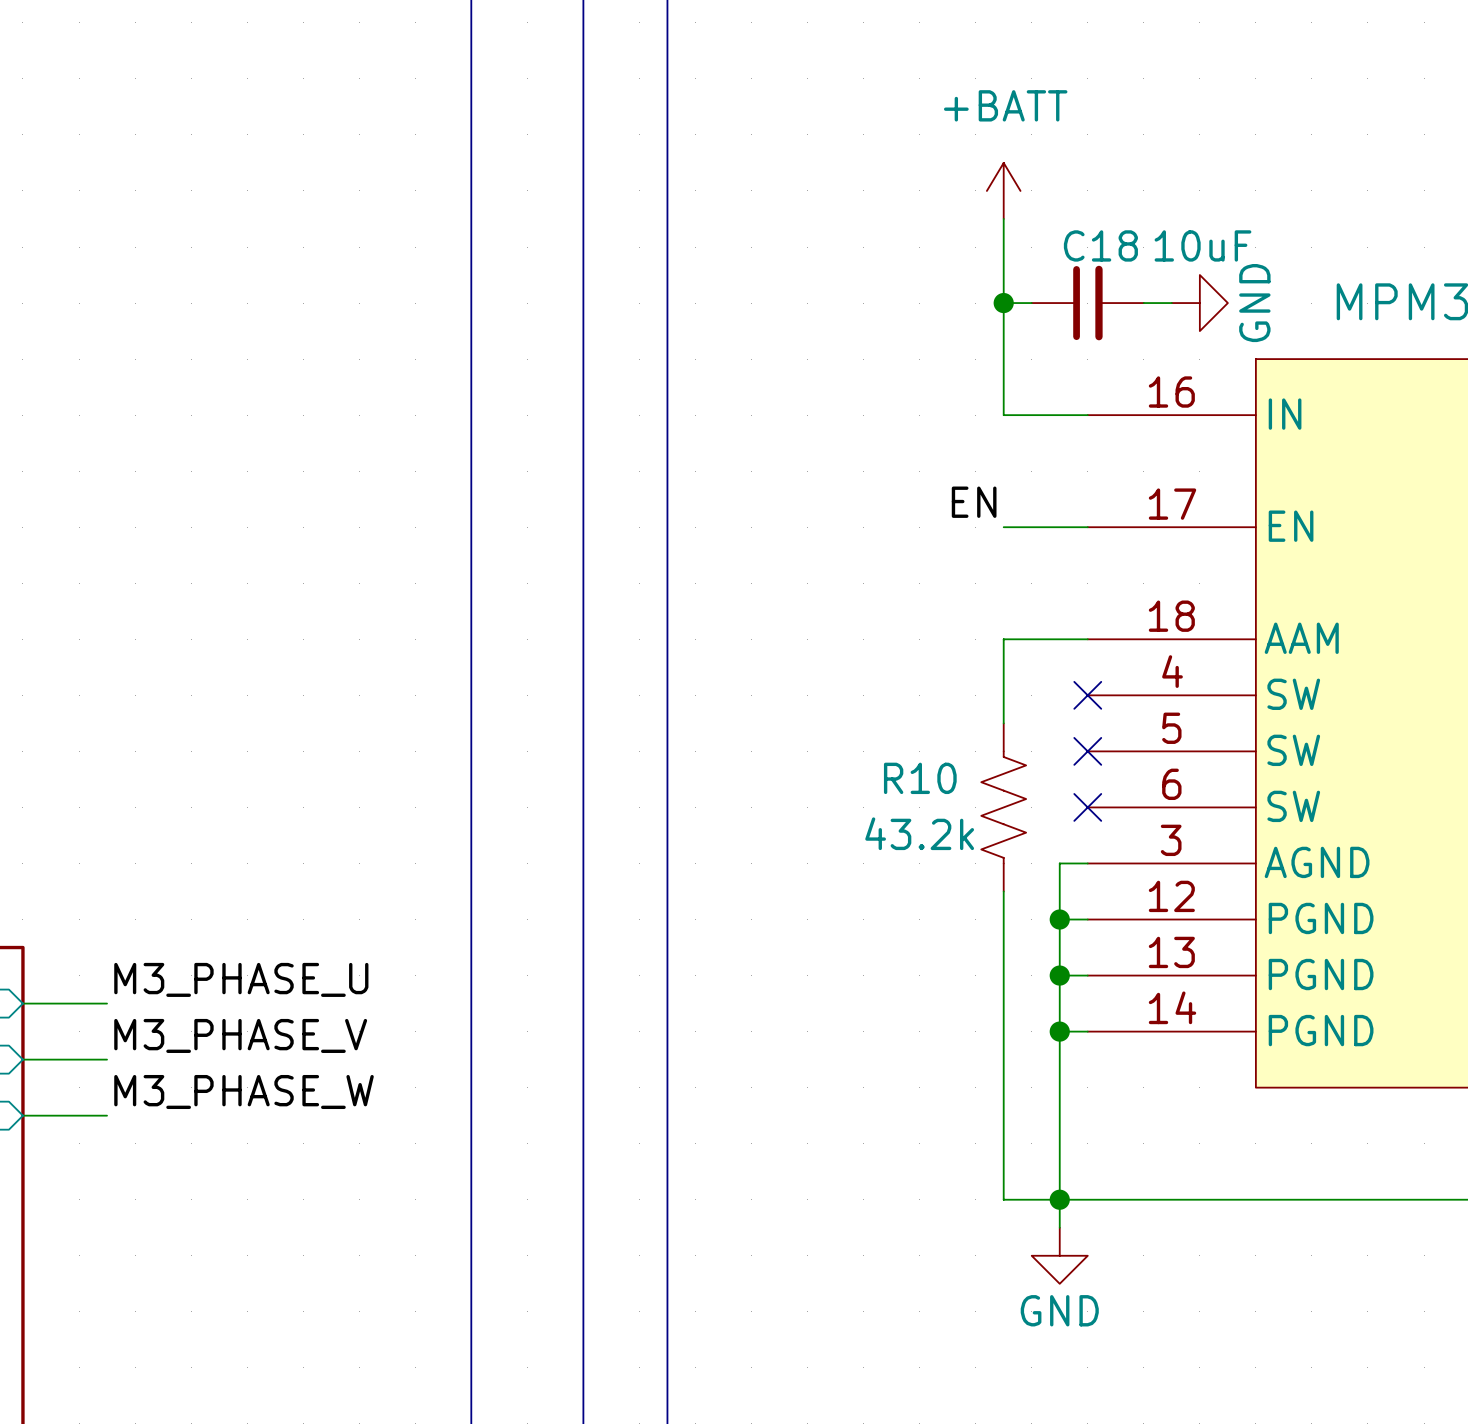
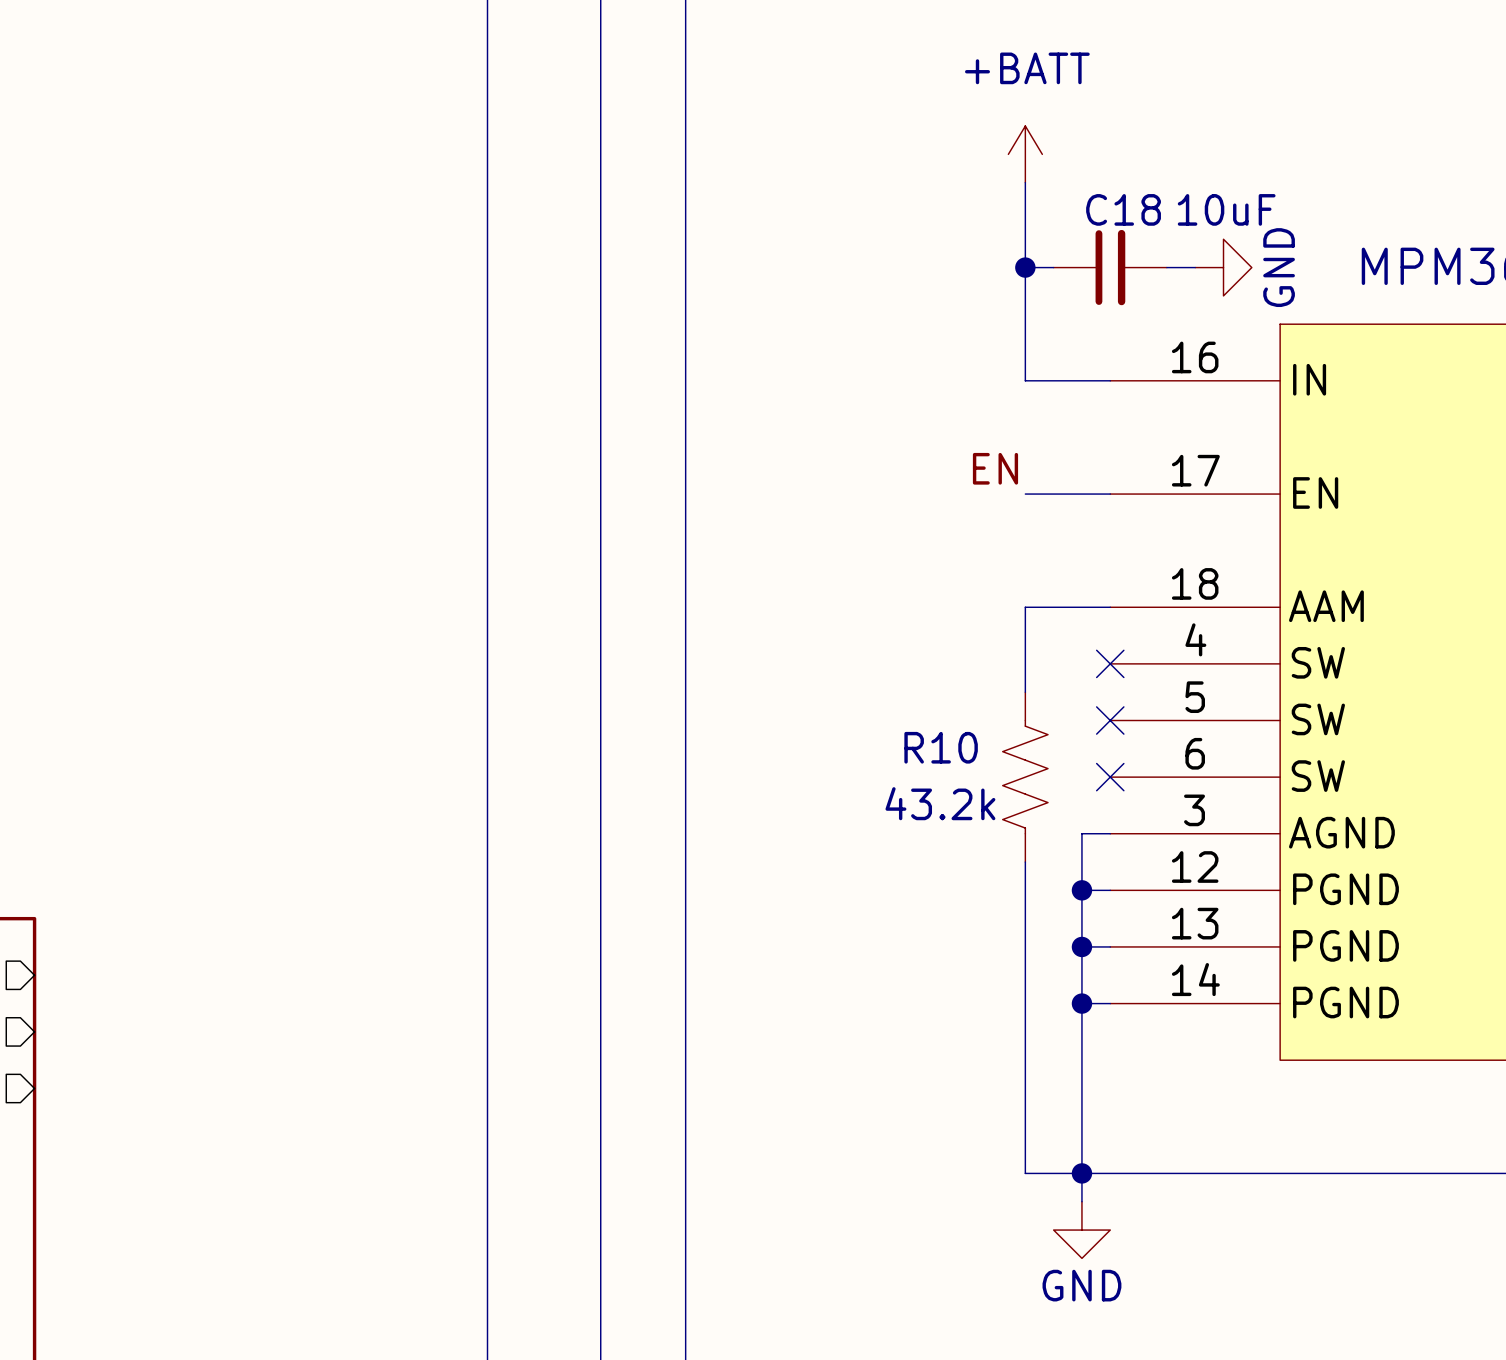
label: M3_PHASE_U (241, 979) -> none
wire: (22, 1003) (107, 1003) -> none
label: M3_PHASE_V (240, 1035) -> none
wire: (22, 1059) (107, 1059) -> none
label: M3_PHASE_W (244, 1091) -> none
wire: (22, 1115) (107, 1115) -> none

